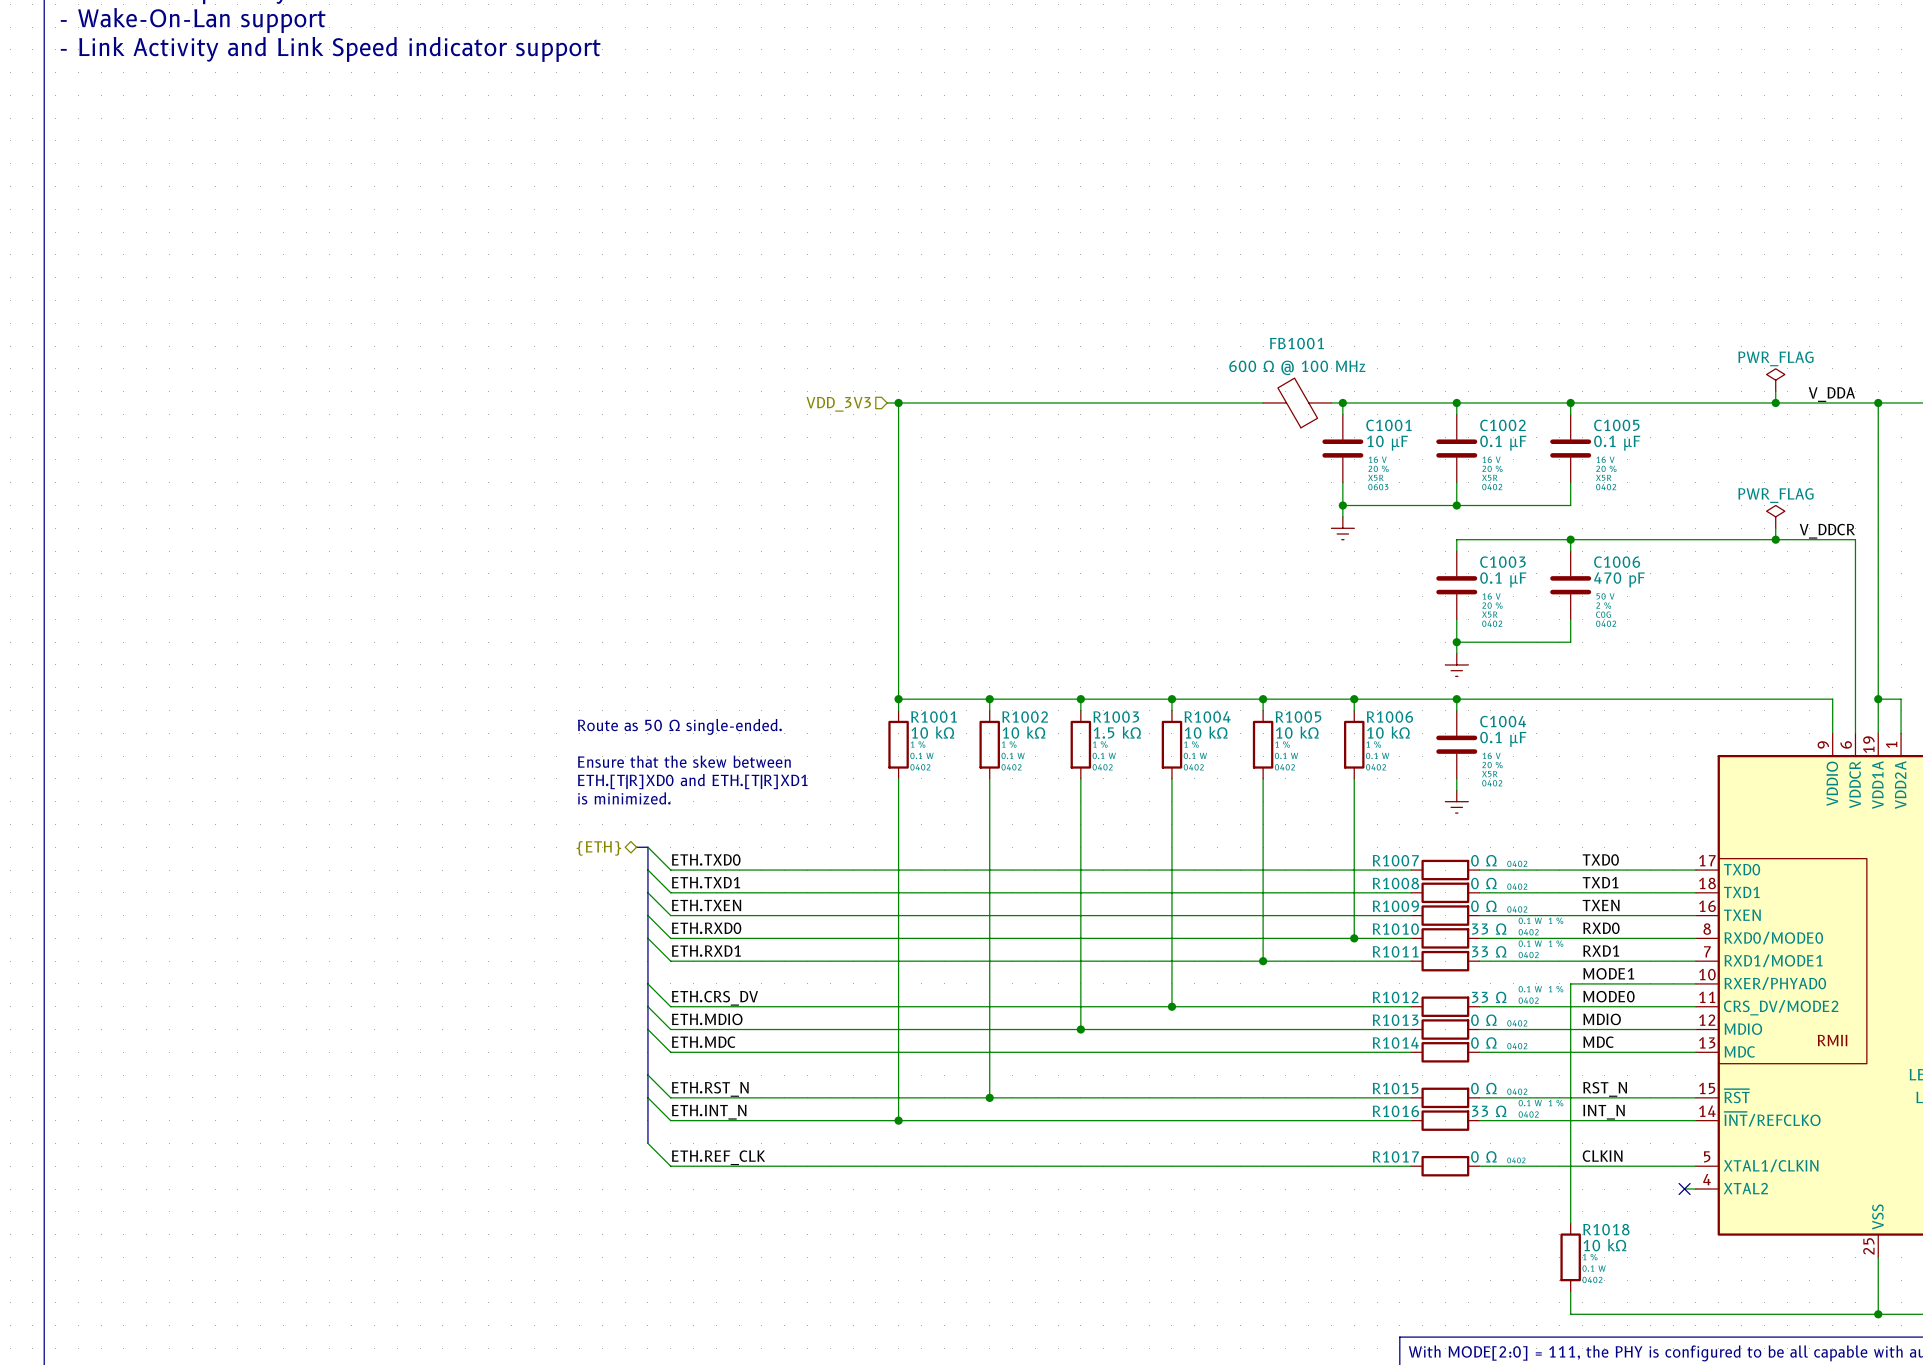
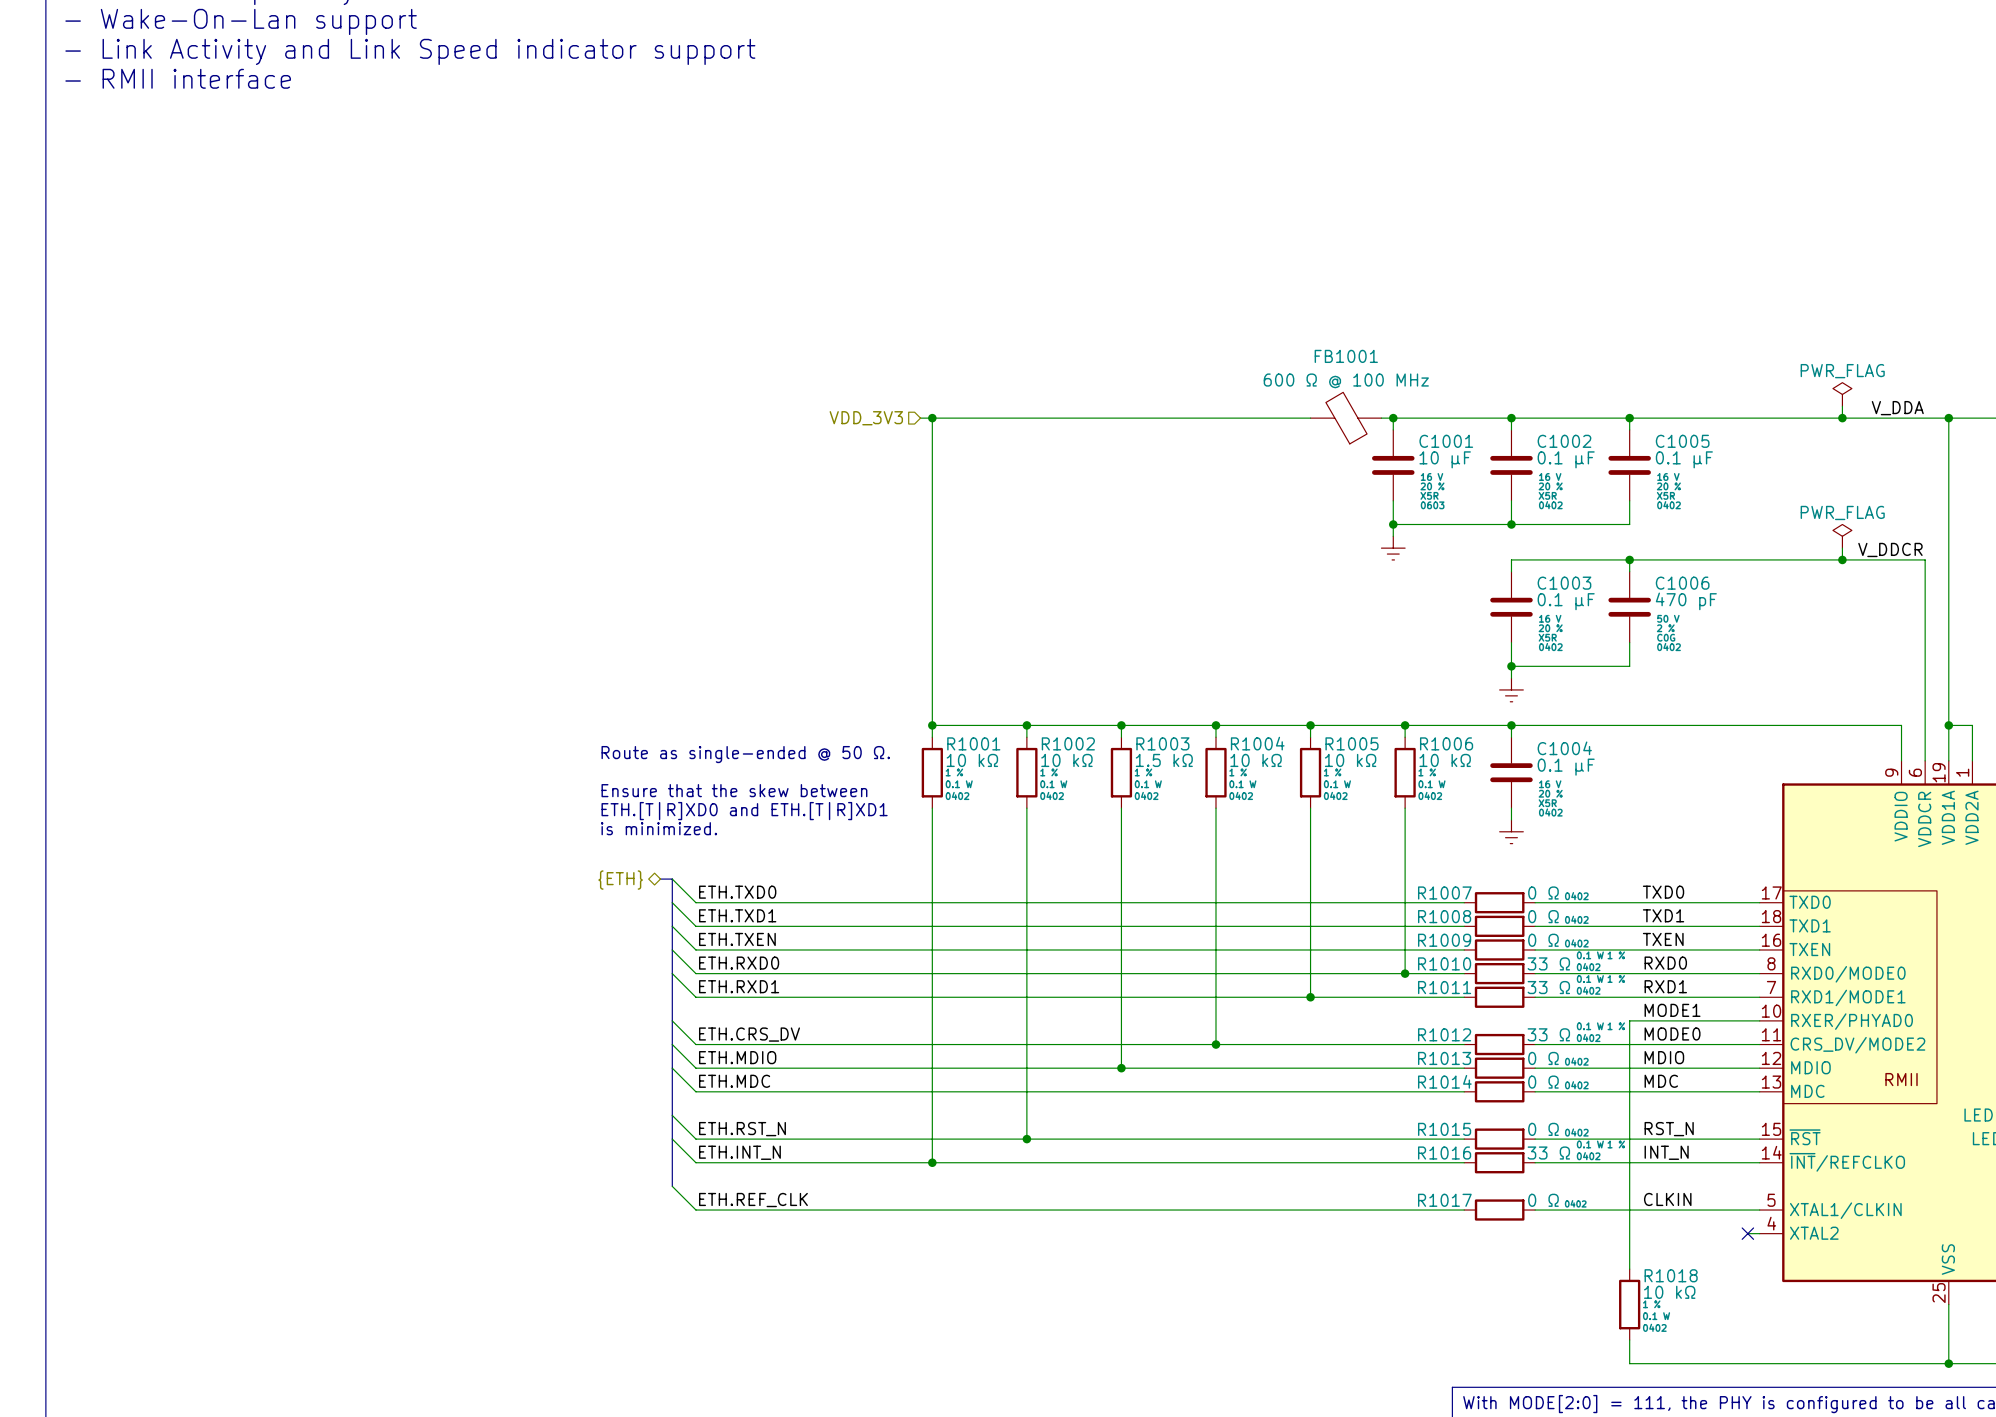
text: none -> - RMII interface (178, 78)
text: Route as 50 Ω single-ended. (679, 726) -> Route as single-ended @ 50 Ω. (745, 754)

